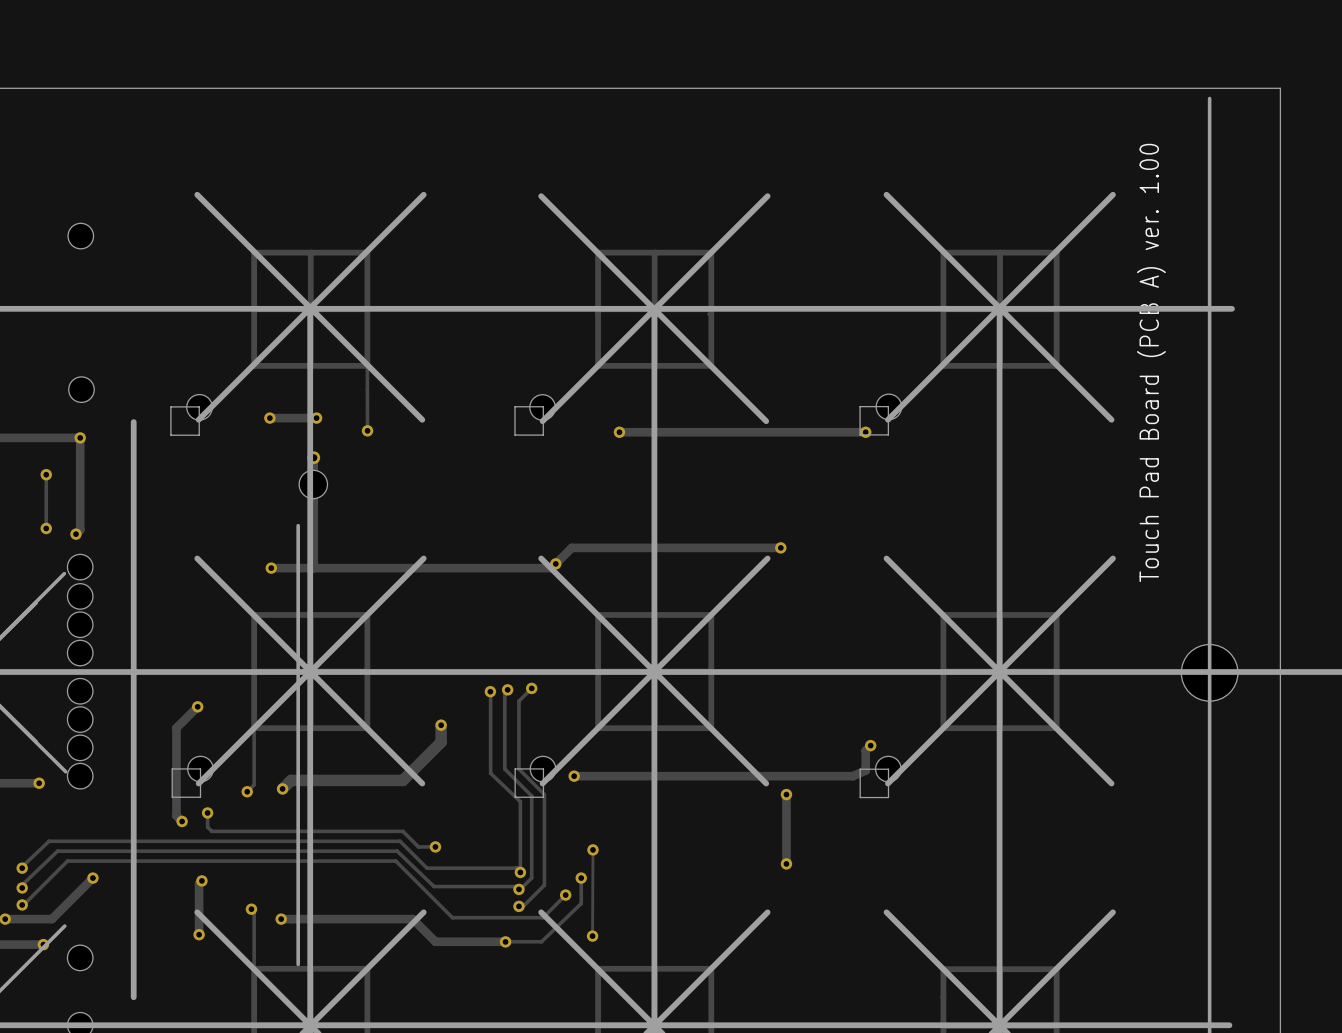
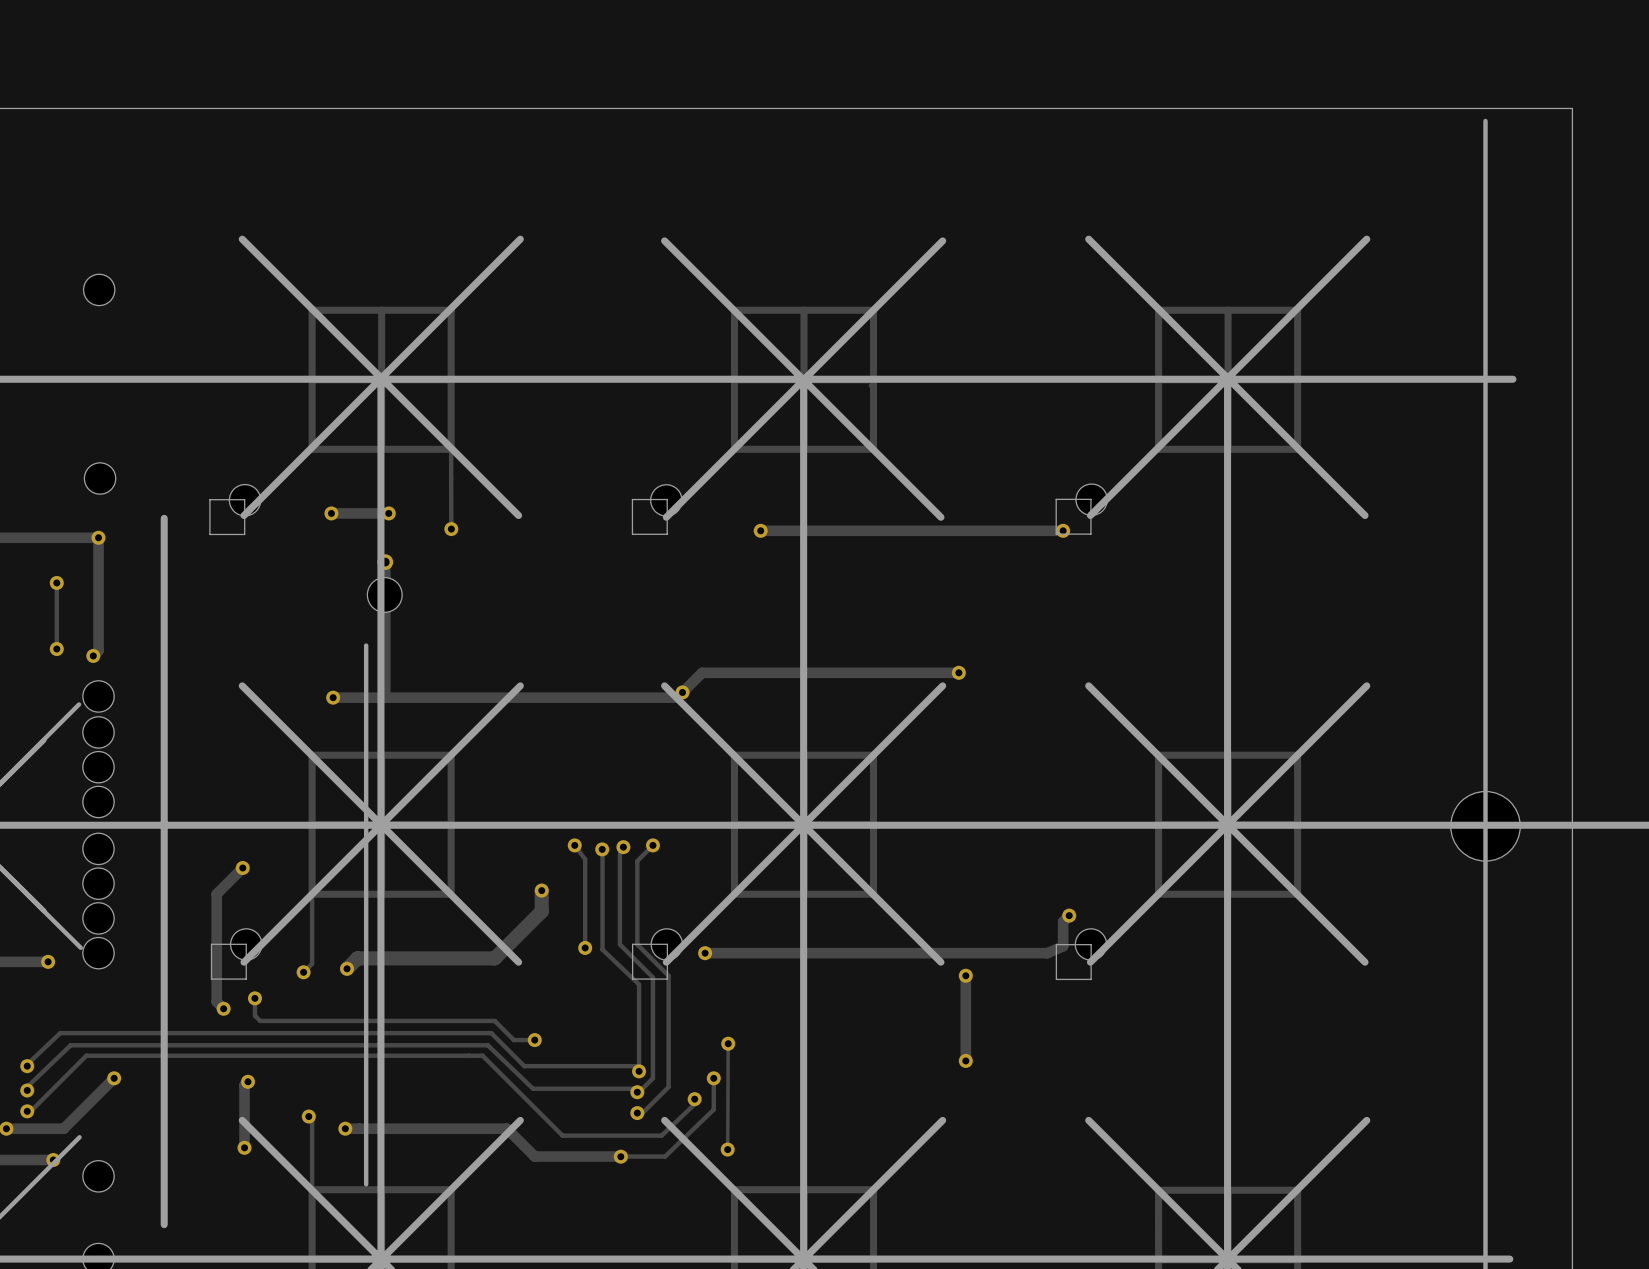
text: Touch Pad Board (PCB A) ver. 1.00 (1151, 362) -> none
track: none -> (574, 845) (585, 859) (585, 947)
via: none -> (574, 845)
via: none -> (585, 947)
track: (565, 895) (543, 917) (452, 917) (395, 861) (67, 861) (22, 904) -> none
track: none -> (698, 1100) (661, 1135) (562, 1135) (482, 1055) (86, 1055) (32, 1109) (23, 1109)

